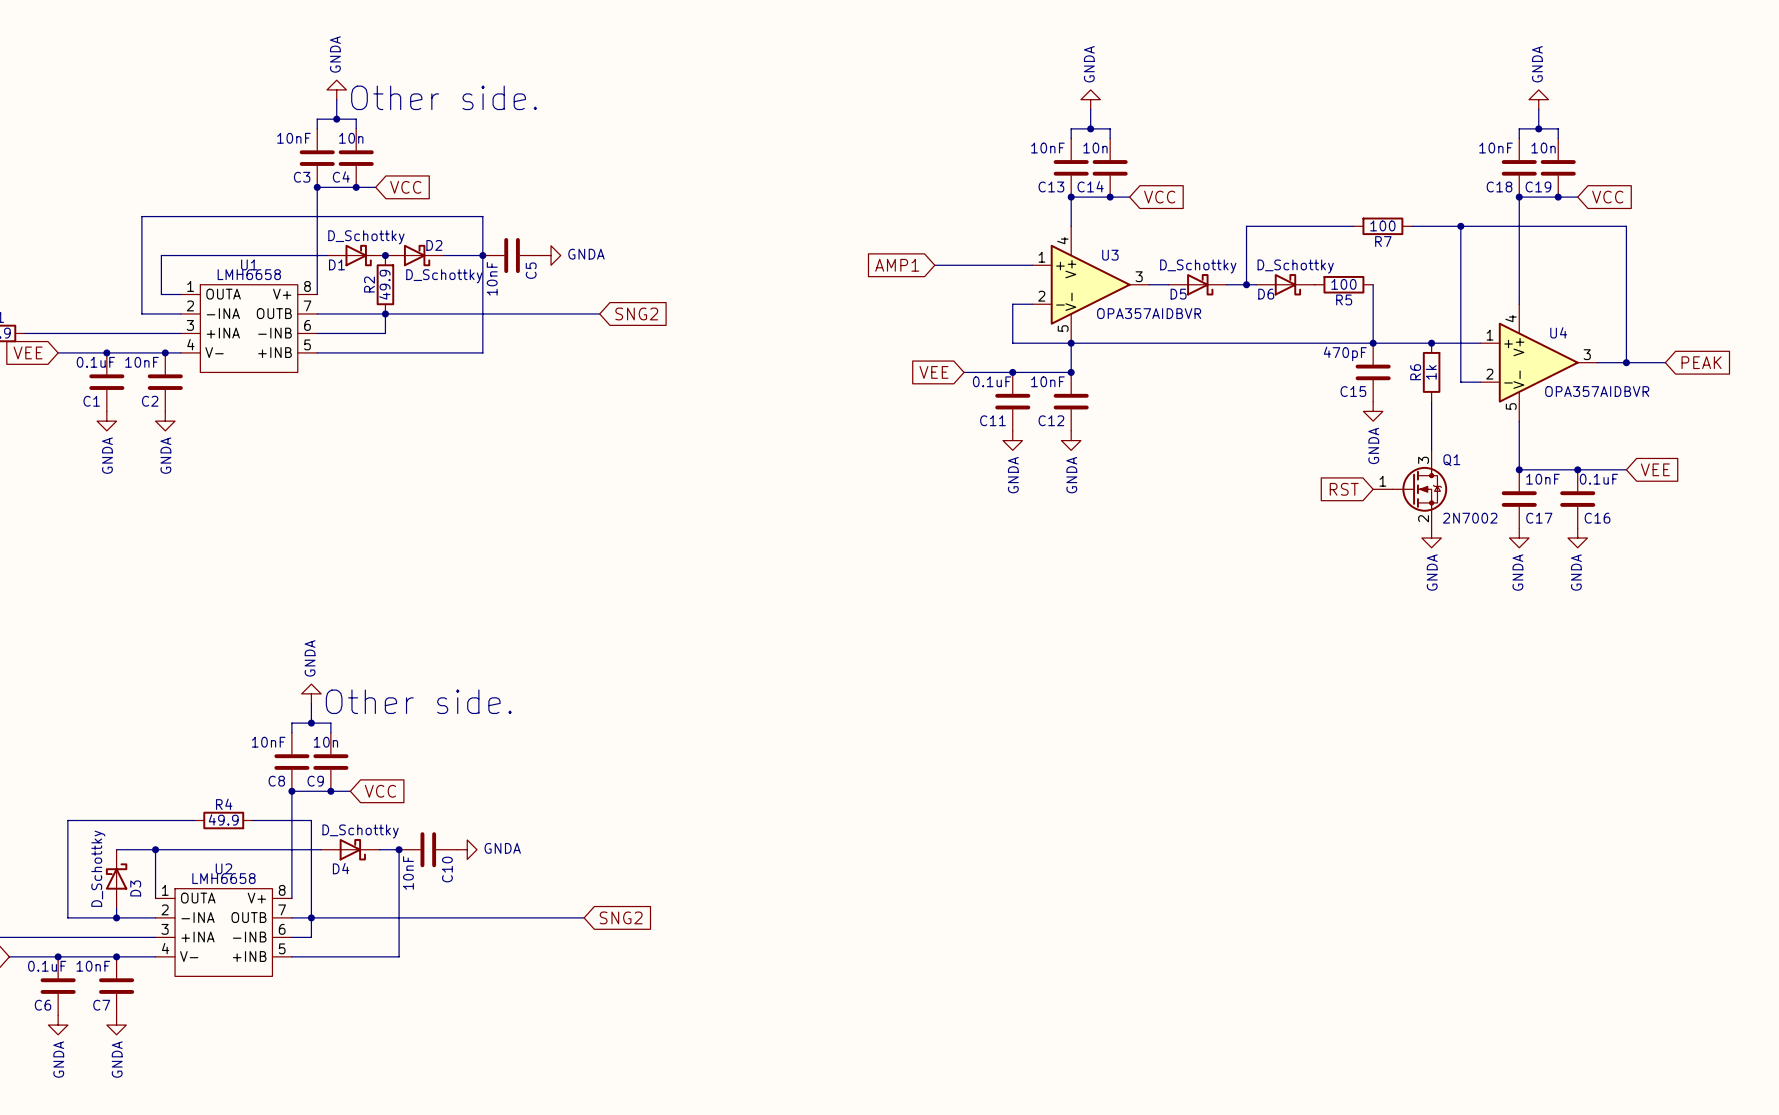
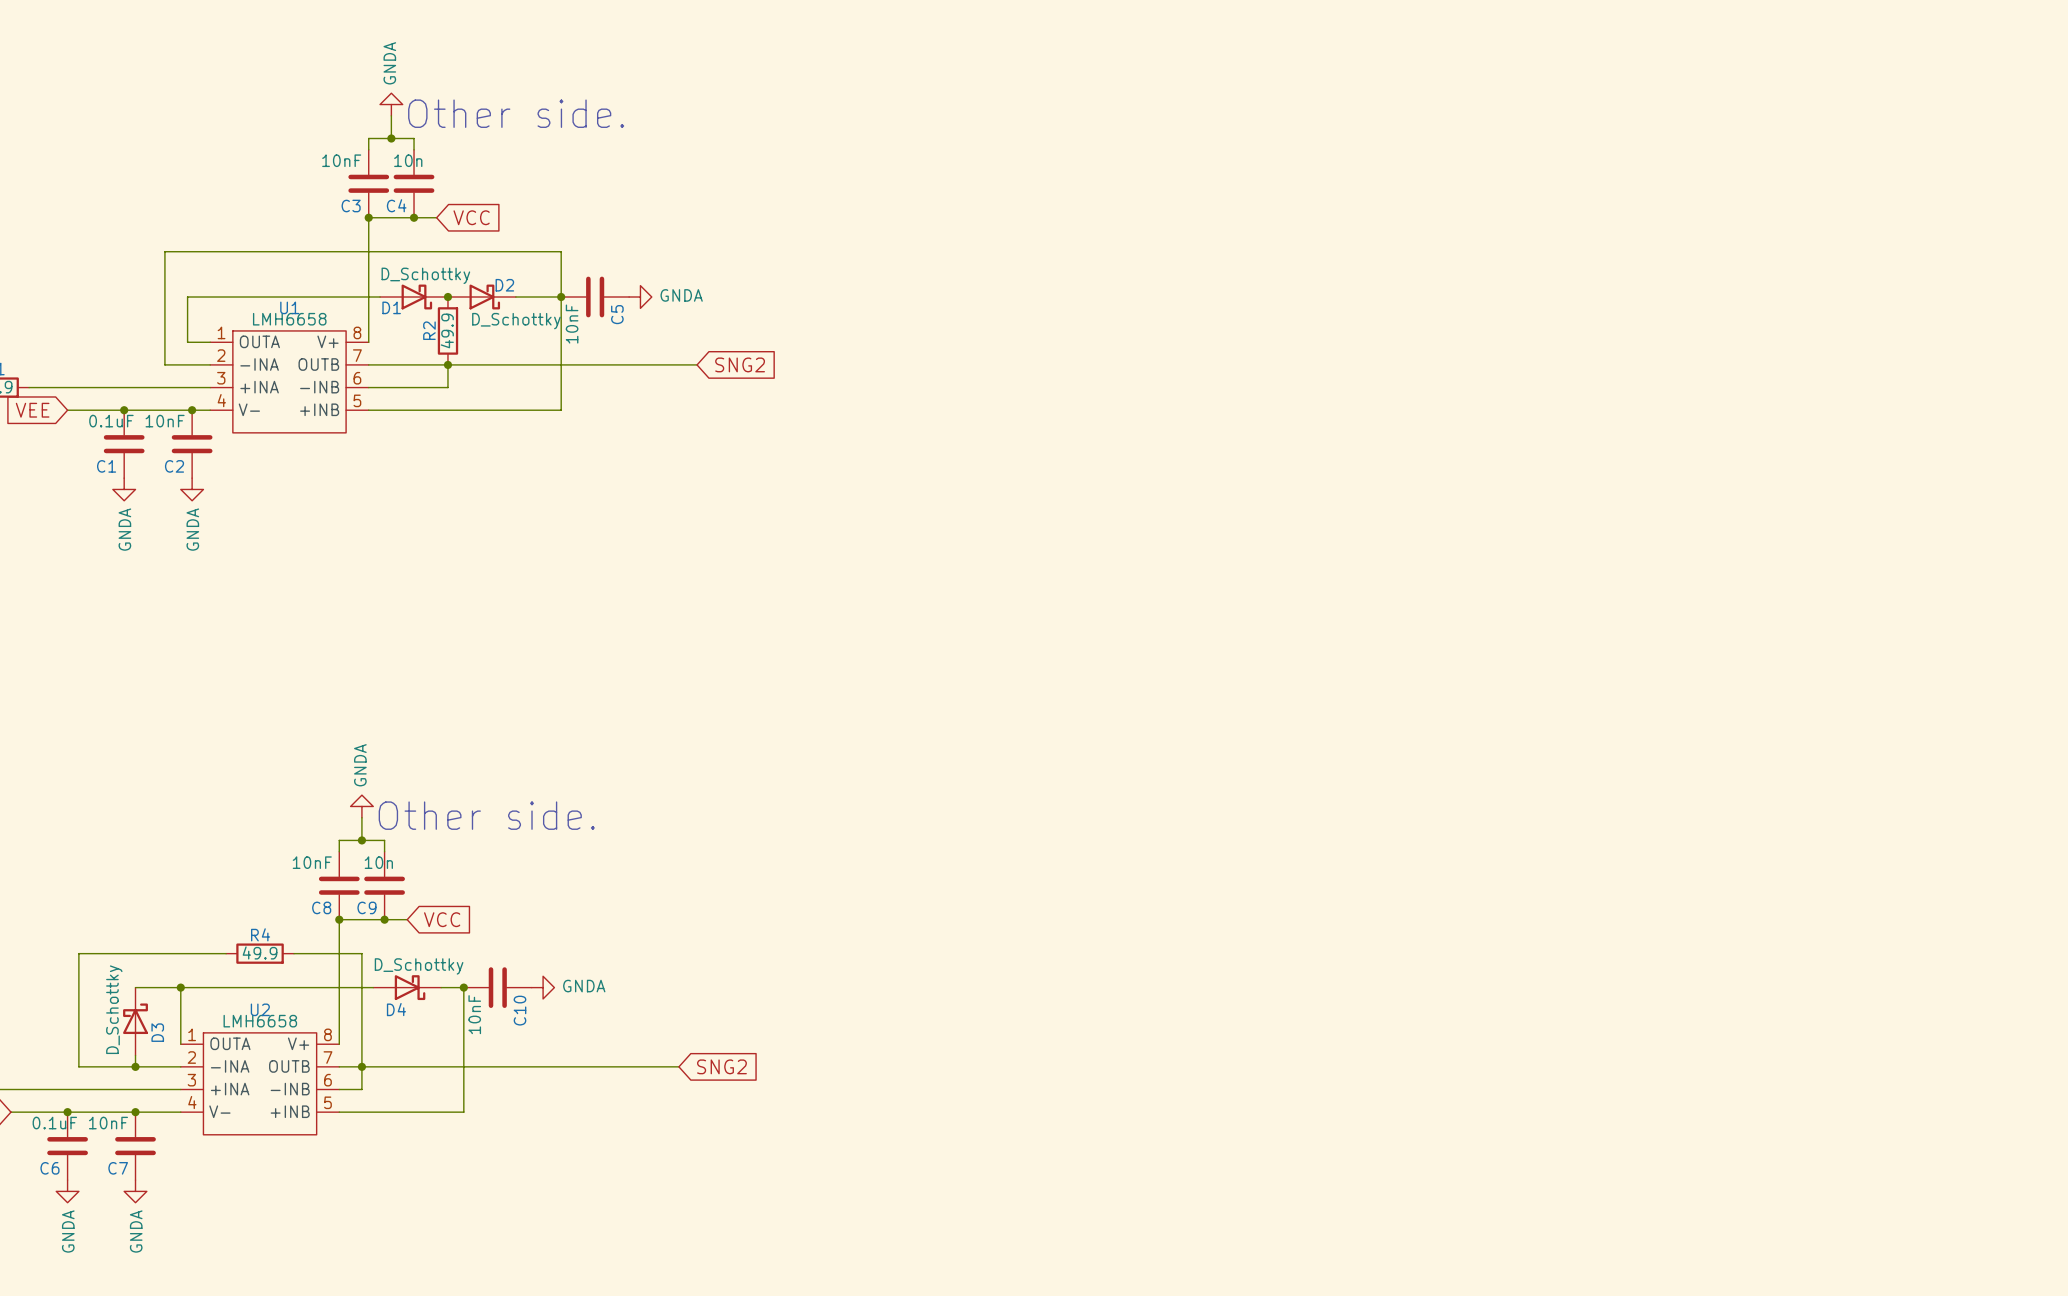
power symbol: GNDA (1090, 99) -> none
power symbol: GNDA (1538, 99) -> none
wire: (1090, 109) (1090, 128) -> none
wire: (1538, 109) (1538, 128) -> none
junction: (1090, 128) -> none
junction: (1538, 128) -> none
wire: (1071, 138) (1071, 128) (1110, 128) (1110, 138) -> none
wire: (1519, 138) (1519, 128) (1558, 128) (1558, 138) -> none
C13: 10nF (1071, 167) -> none
C14: 10n (1110, 167) -> none
C18: 10nF (1519, 167) -> none
C19: 10n (1558, 167) -> none
junction: (1071, 197) -> none
junction: (1110, 197) -> none
wire: (1129, 197) (1071, 197) (1071, 226) -> none
global label: VCC (1159, 197) -> none
junction: (1519, 197) -> none
junction: (1558, 197) -> none
wire: (1577, 197) (1519, 197) (1519, 304) -> none
global label: VCC (1607, 197) -> none
wire: (1353, 226) (1246, 226) (1246, 284) -> none
R7: 100 (1382, 226) -> none
wire: (1412, 226) (1626, 226) (1626, 362) -> none
wire: (1460, 226) (1460, 382) (1480, 382) -> none
junction: (1460, 226) -> none
global label: AMP1 (897, 265) -> none
wire: (934, 265) (1032, 265) -> none
U3: OPA357AIDBVR (1090, 284) -> none
wire: (1149, 284) (1168, 284) -> none
D5: D_Schottky (1197, 284) -> none
wire: (1227, 284) (1256, 284) -> none
junction: (1246, 284) -> none
D6: D_Schottky (1285, 284) -> none
R5: 100 (1343, 284) -> none
wire: (1373, 284) (1373, 343) -> none
wire: (1032, 304) (1012, 304) (1012, 343) (1480, 343) -> none
wire: (1071, 343) (1071, 372) (964, 372) -> none
junction: (1071, 343) -> none
junction: (1373, 343) -> none
junction: (1431, 343) -> none
U4: OPA357AIDBVR (1538, 362) -> none
wire: (1597, 362) (1665, 362) -> none
junction: (1626, 362) -> none
global label: PEAK (1701, 362) -> none
global label: VEE (933, 372) -> none
junction: (1012, 372) -> none
junction: (1071, 372) -> none
C15: 470pF (1373, 372) -> none
R6: 1k (1431, 372) -> none
C11: 0.1uF (1012, 401) -> none
C12: 10nF (1071, 401) -> none
wire: (1431, 401) (1431, 450) -> none
power symbol: GNDA (1373, 411) -> none
wire: (1519, 421) (1519, 469) (1626, 469) -> none
power symbol: GNDA (1012, 440) -> none
power symbol: GNDA (1071, 440) -> none
junction: (1519, 469) -> none
junction: (1577, 469) -> none
global label: VEE (1655, 469) -> none
global label: RST (1344, 489) -> none
Q1: 2N7002 (1410, 489) -> none
C17: 10nF (1519, 499) -> none
C16: 0.1uF (1577, 499) -> none
power symbol: GNDA (1431, 538) -> none
power symbol: GNDA (1519, 538) -> none
power symbol: GNDA (1577, 538) -> none

